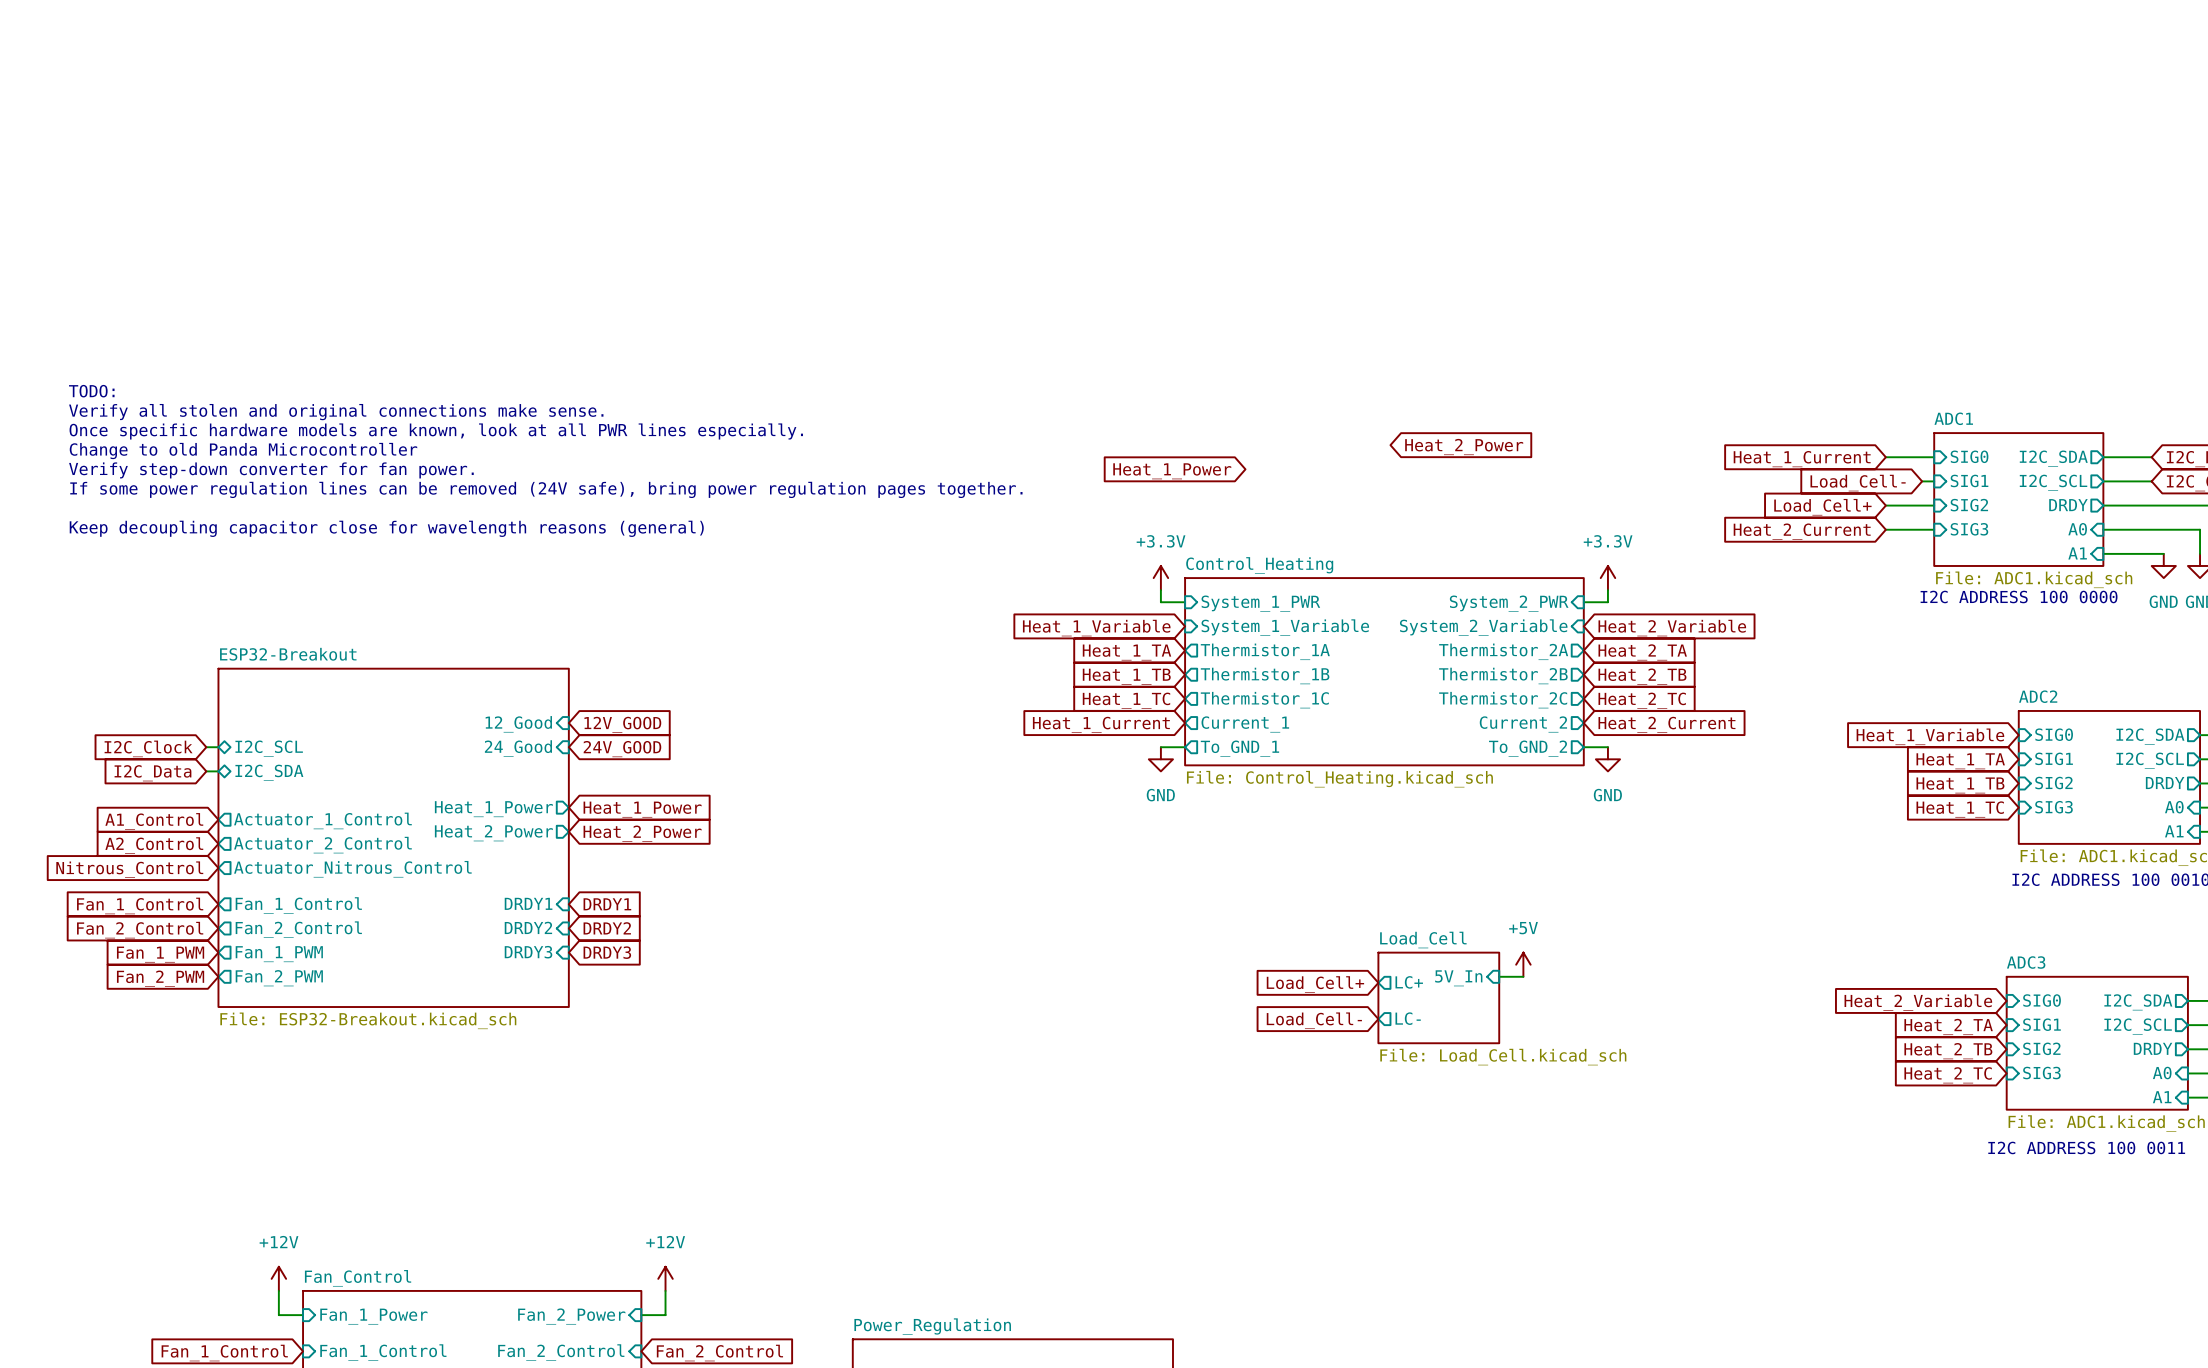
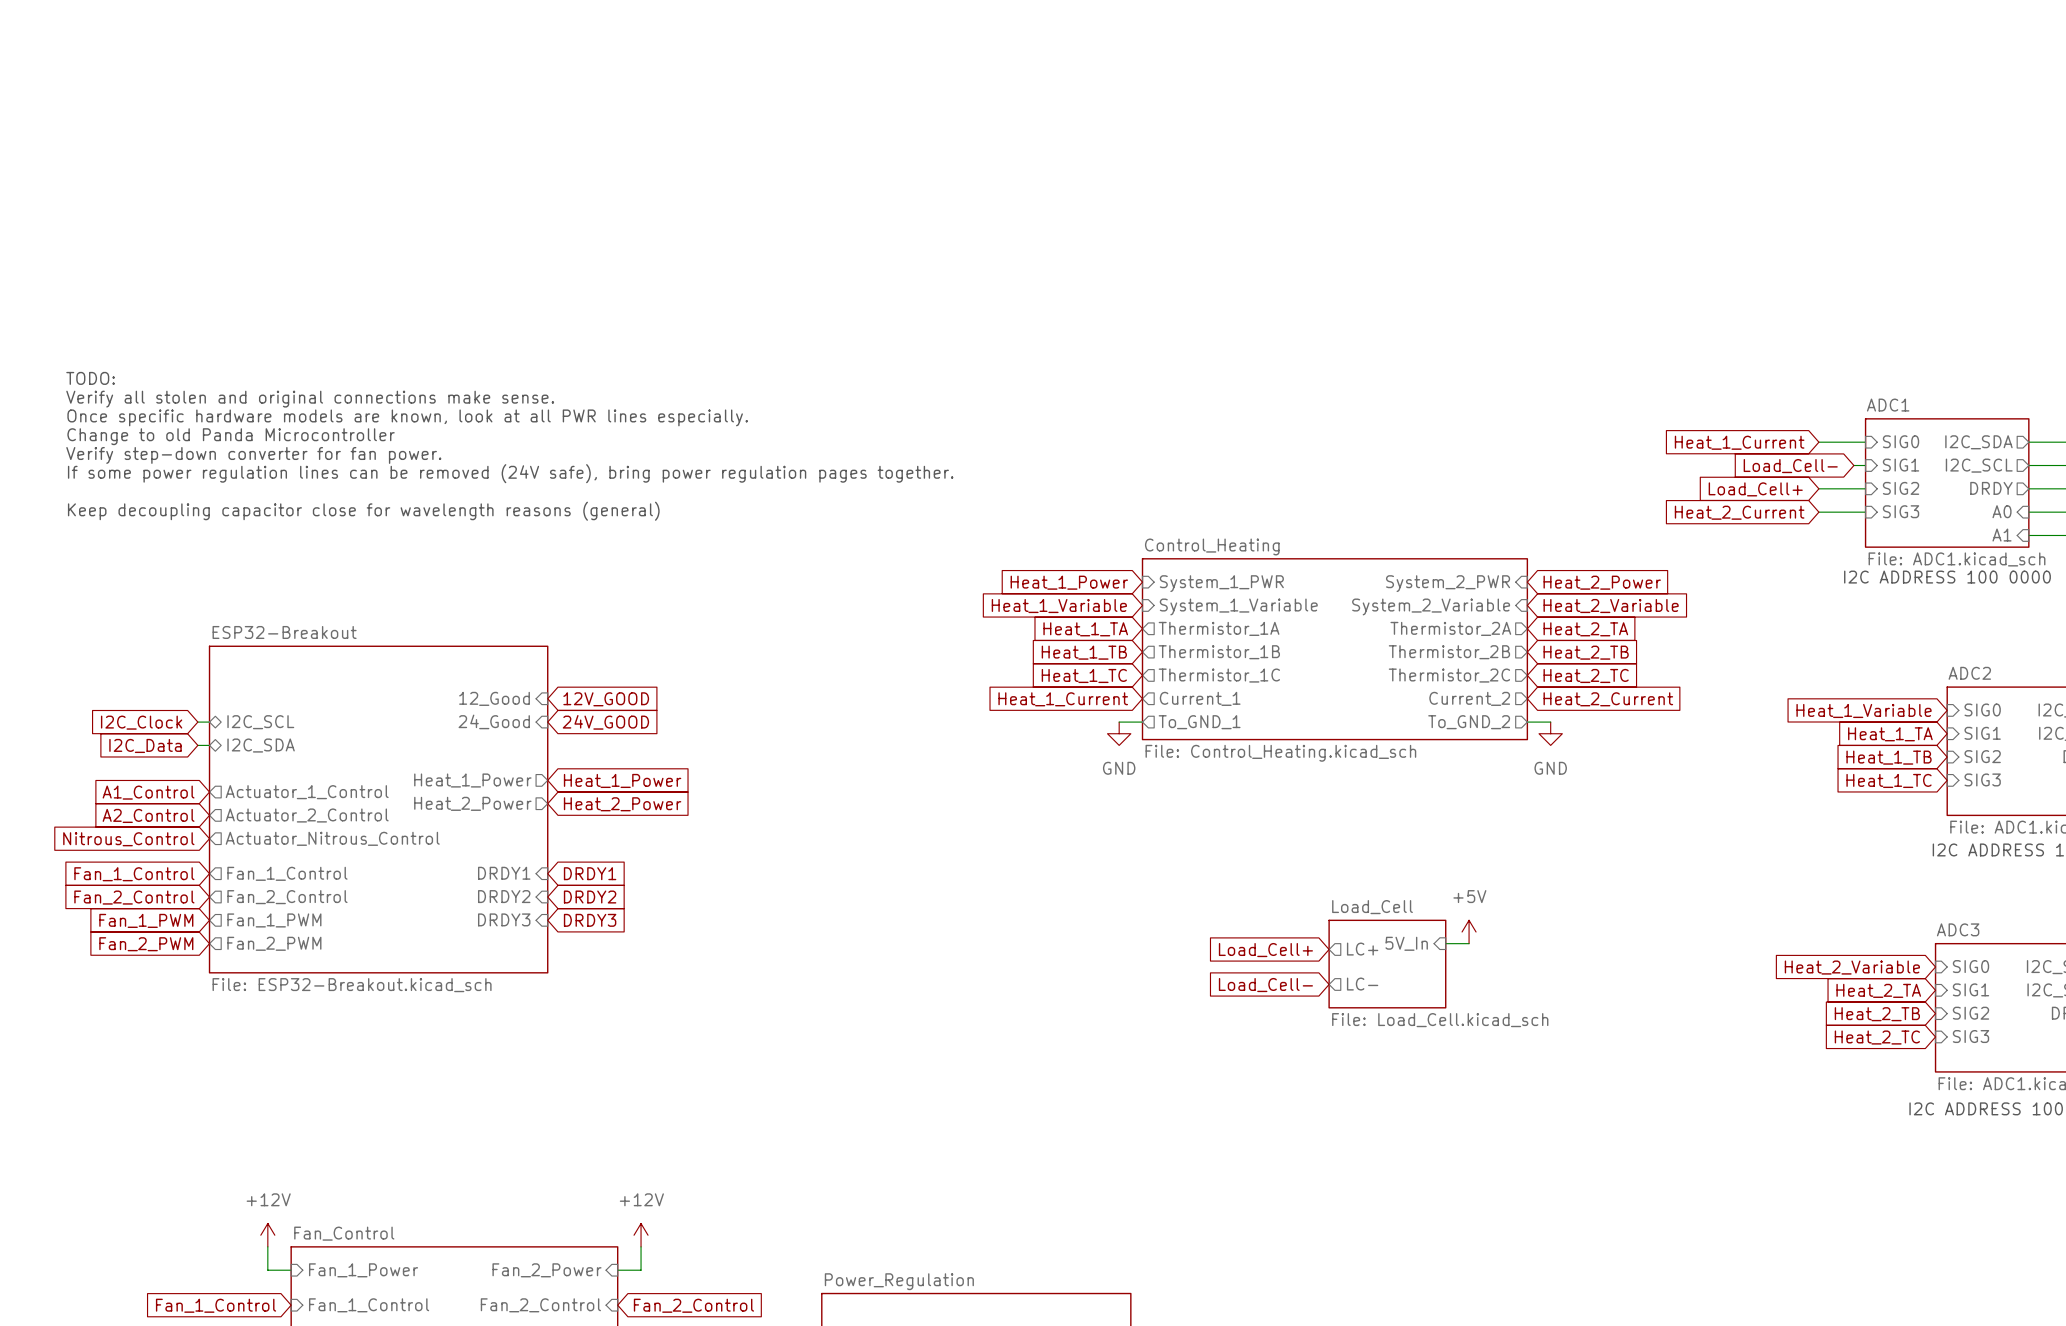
global label: Heat_2_Power (1464, 447) -> none
global label position: Heat_1_Power (1172, 471) -> Heat_1_Power (1069, 582)
power symbol: +3.3V (1160, 578) -> none
power symbol: +3.3V (1607, 578) -> none
wire: (1160, 590) (1160, 602) (1185, 602) -> none
wire: (1607, 590) (1607, 602) (1583, 602) -> none
global label: none -> Heat_2_Power (1602, 582)

